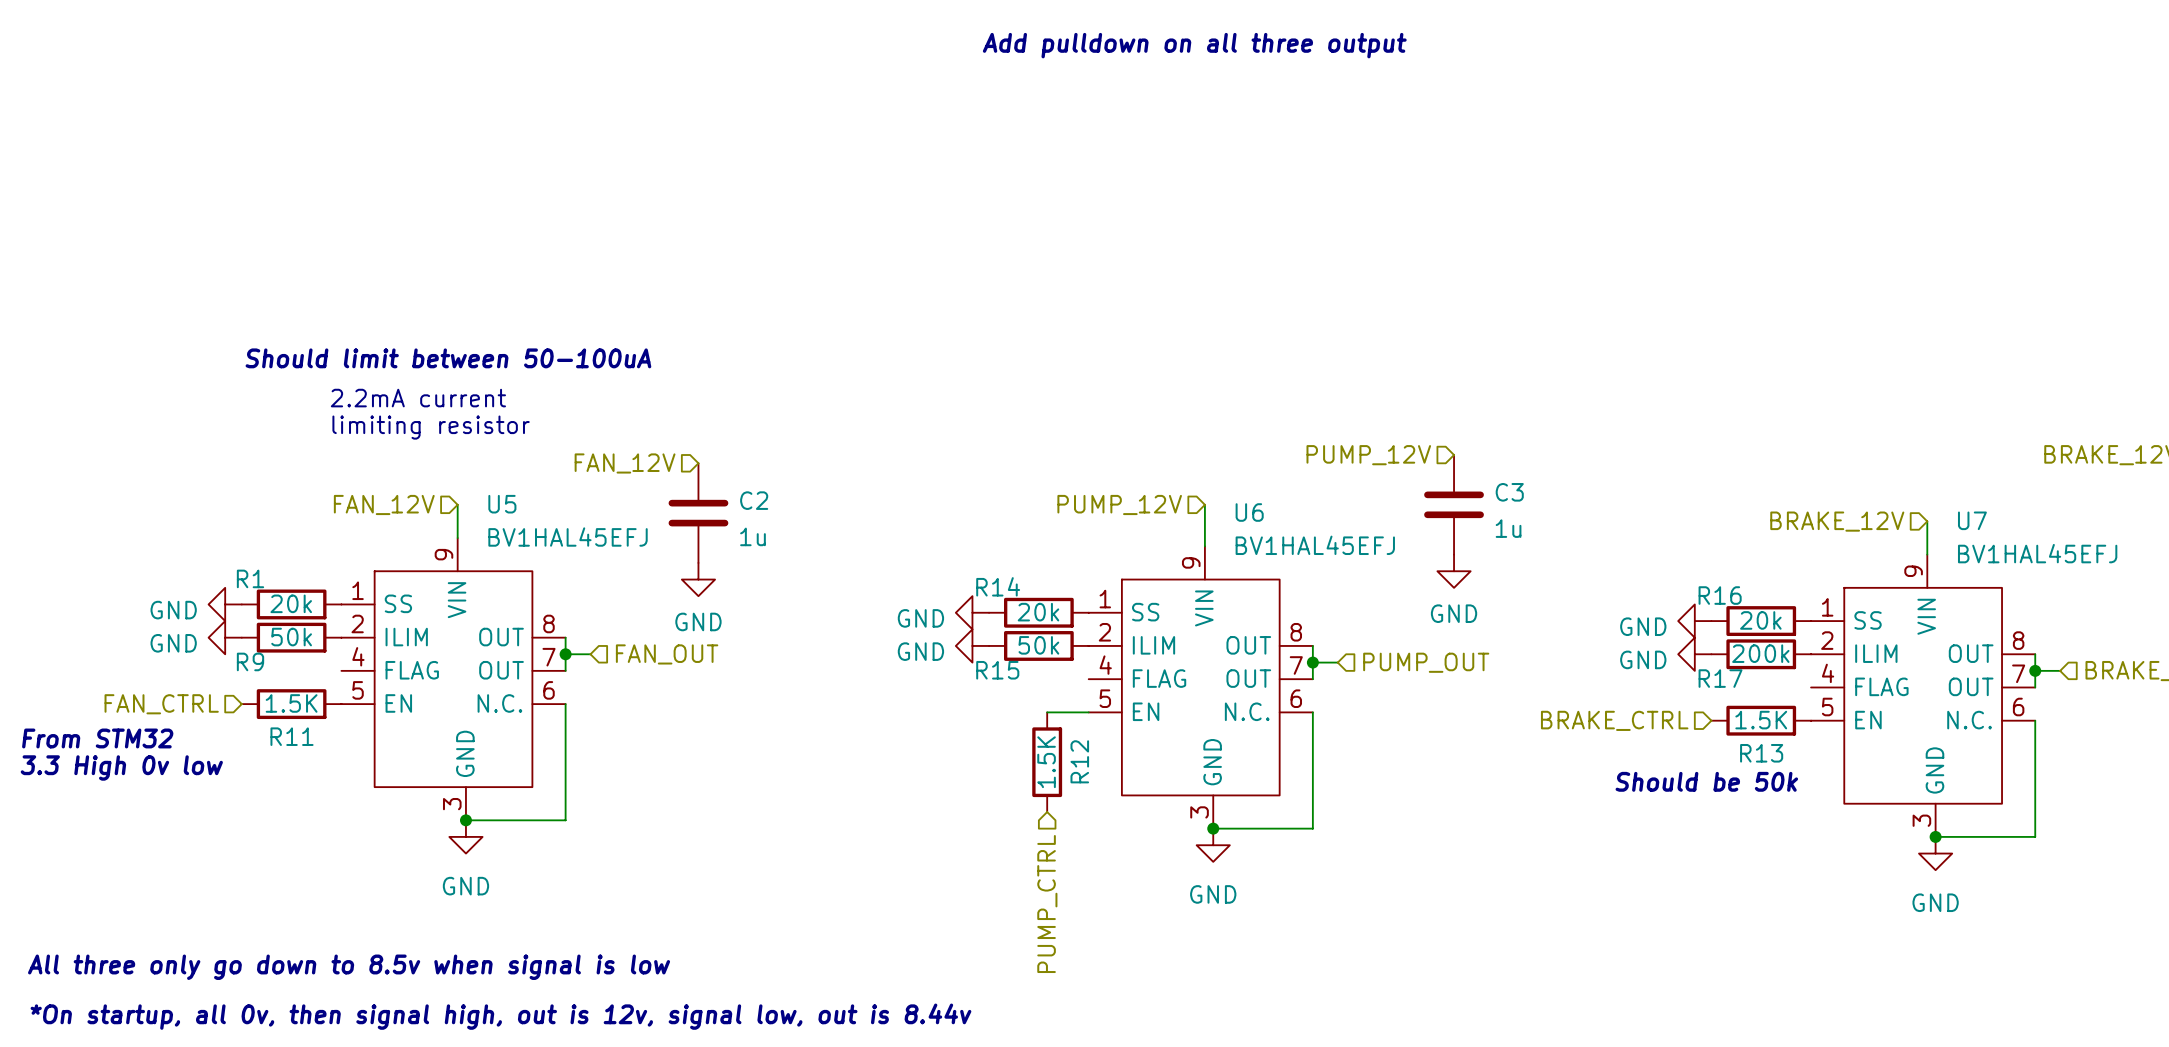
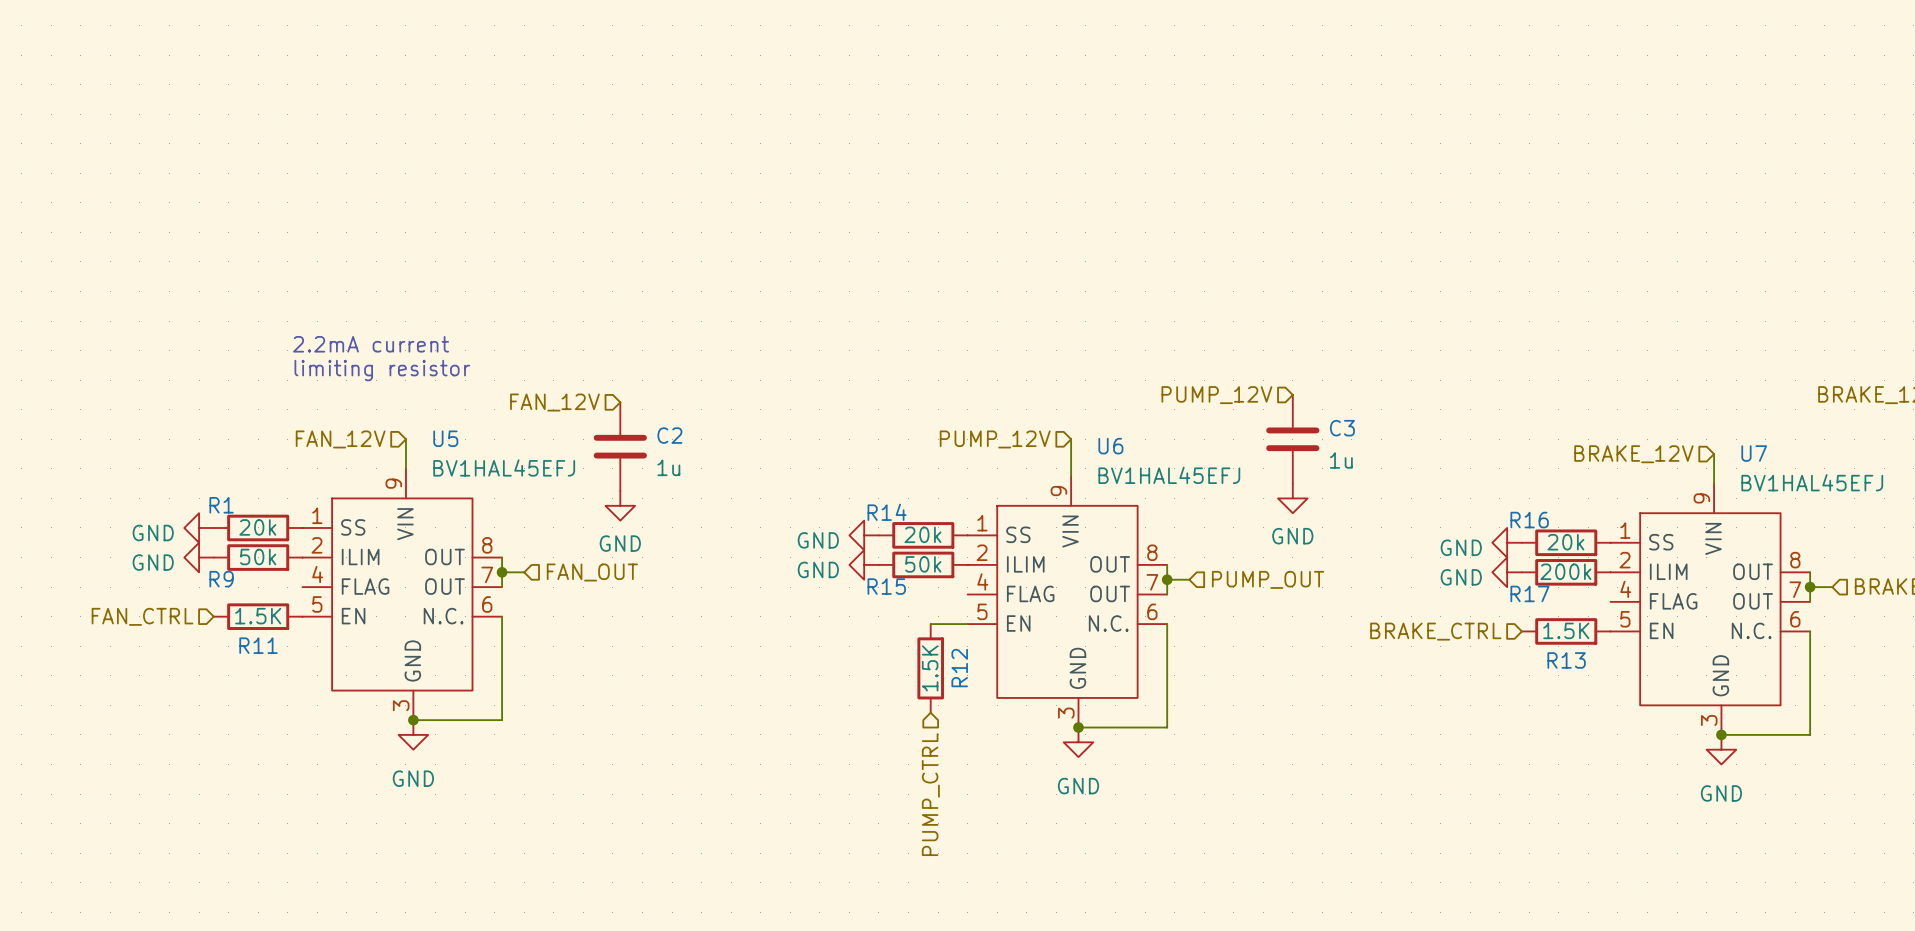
text: Add pulldown on all three output (1194, 45) -> none
text: Should limit between 50-100uA (448, 358) -> none
text: From STM32 (97, 738) -> none
text: 3.3 High 0v low (121, 767) -> none
text: Should be 50k (1706, 781) -> none
text: All three only go down to 8.5v when signal is low (349, 967) -> none
text: *On startup, all 0v, then signal high, out is 12v, signal low, out is 8.44v (500, 1016) -> none

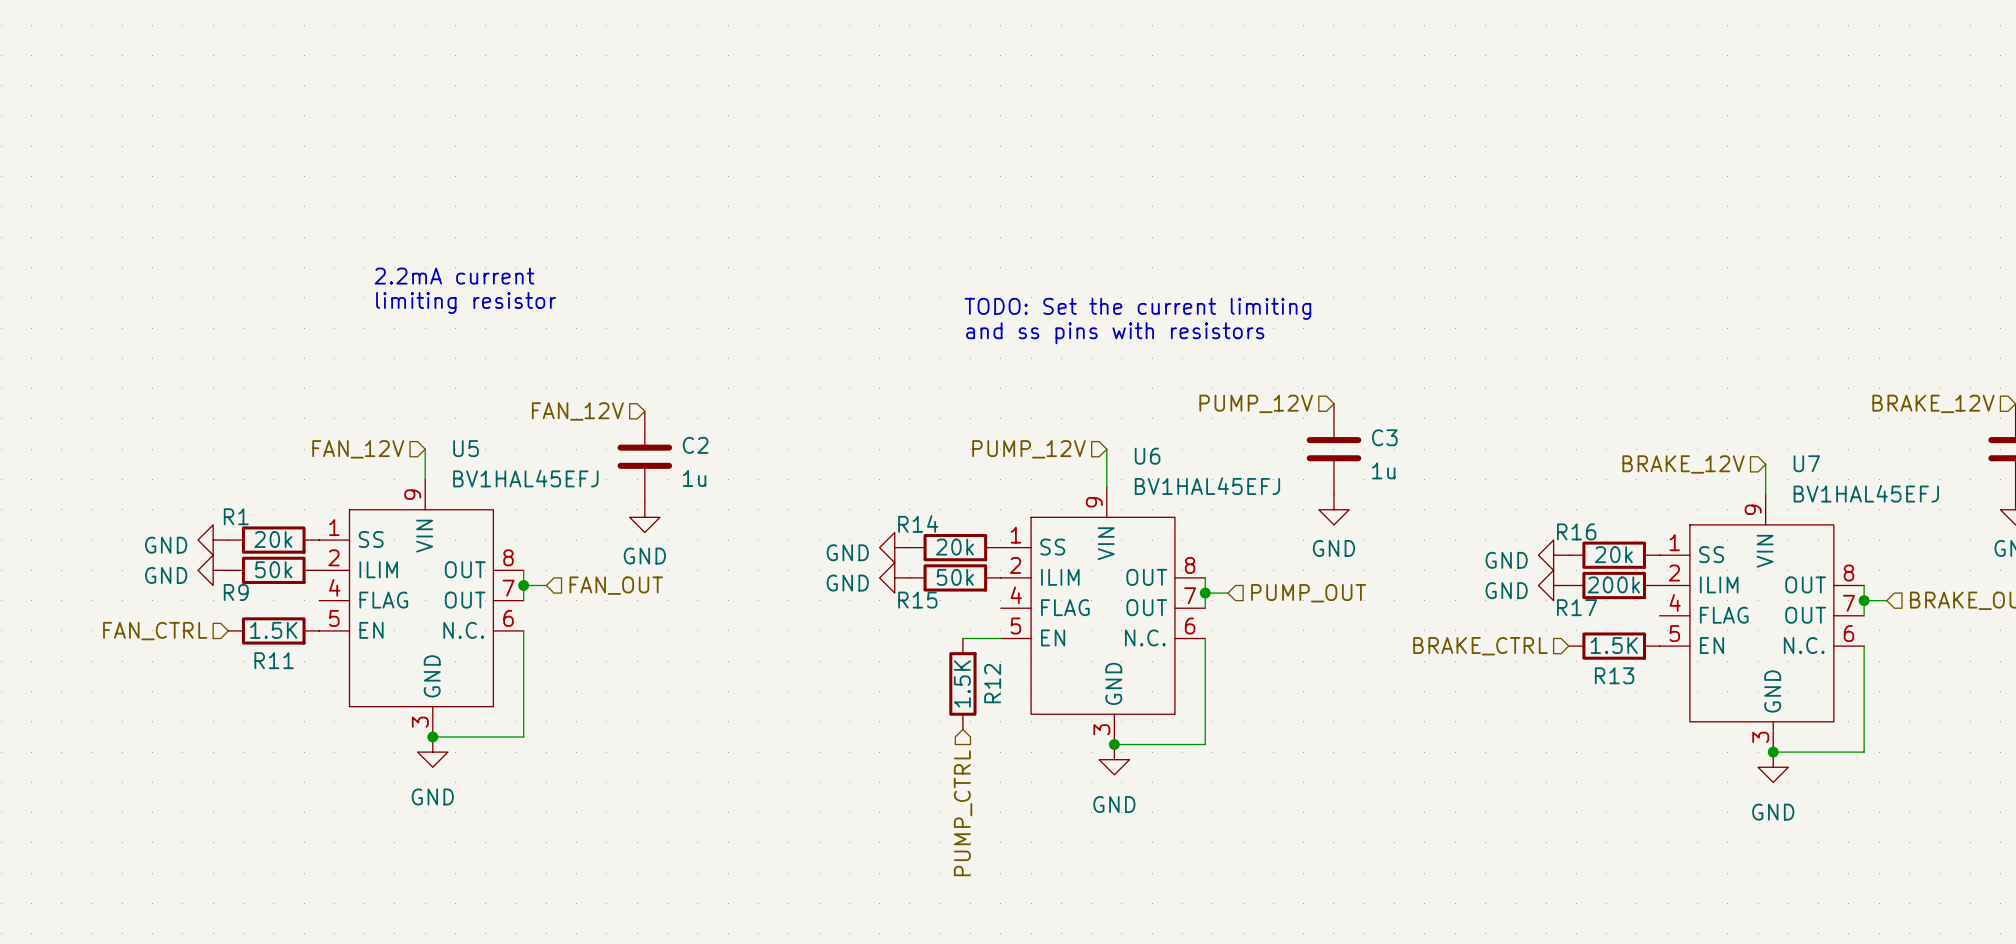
text: none -> TODO: Set the current limiting (1137, 308)
text: none -> and ss pins with resistors (1115, 333)
text position: 2.2mA current (371, 344) -> 2.2mA current (454, 276)
text position: limiting resistor (382, 370) -> limiting resistor (466, 302)

